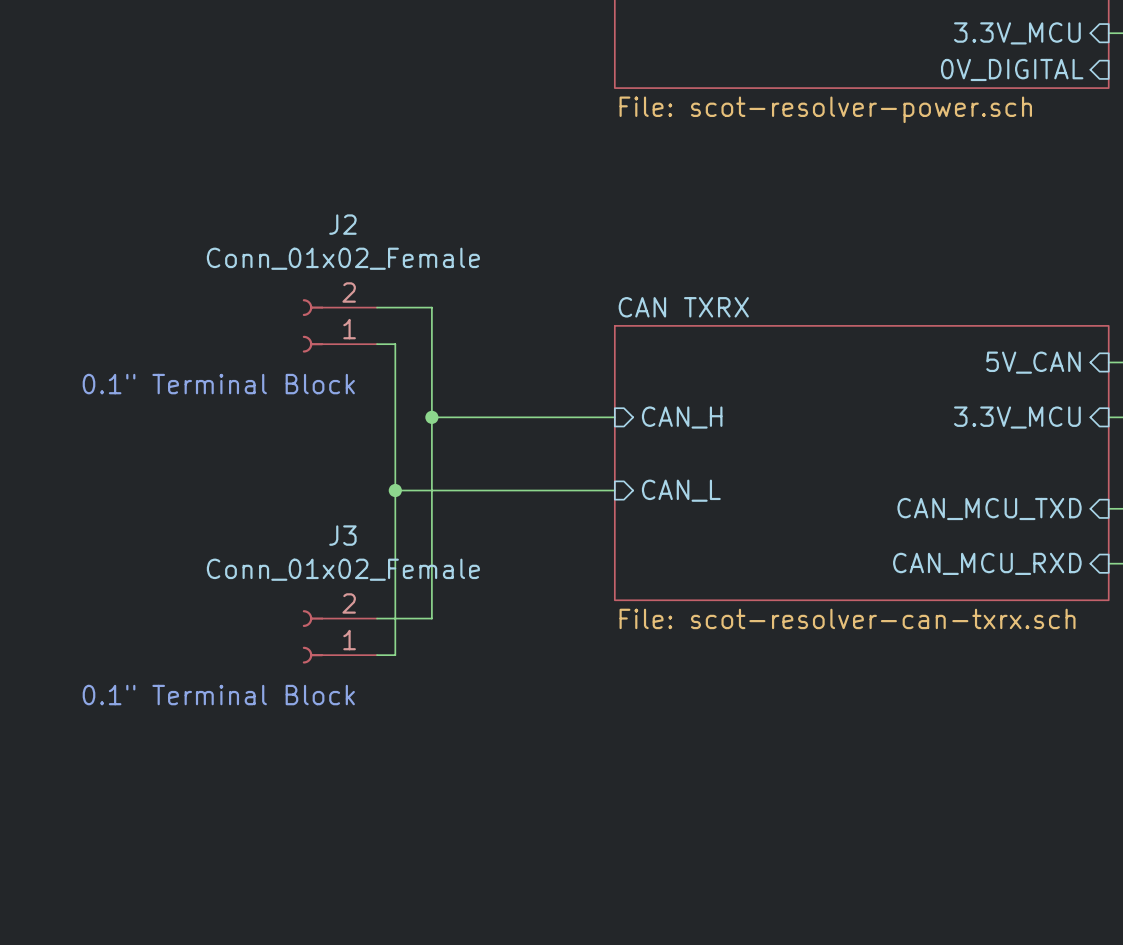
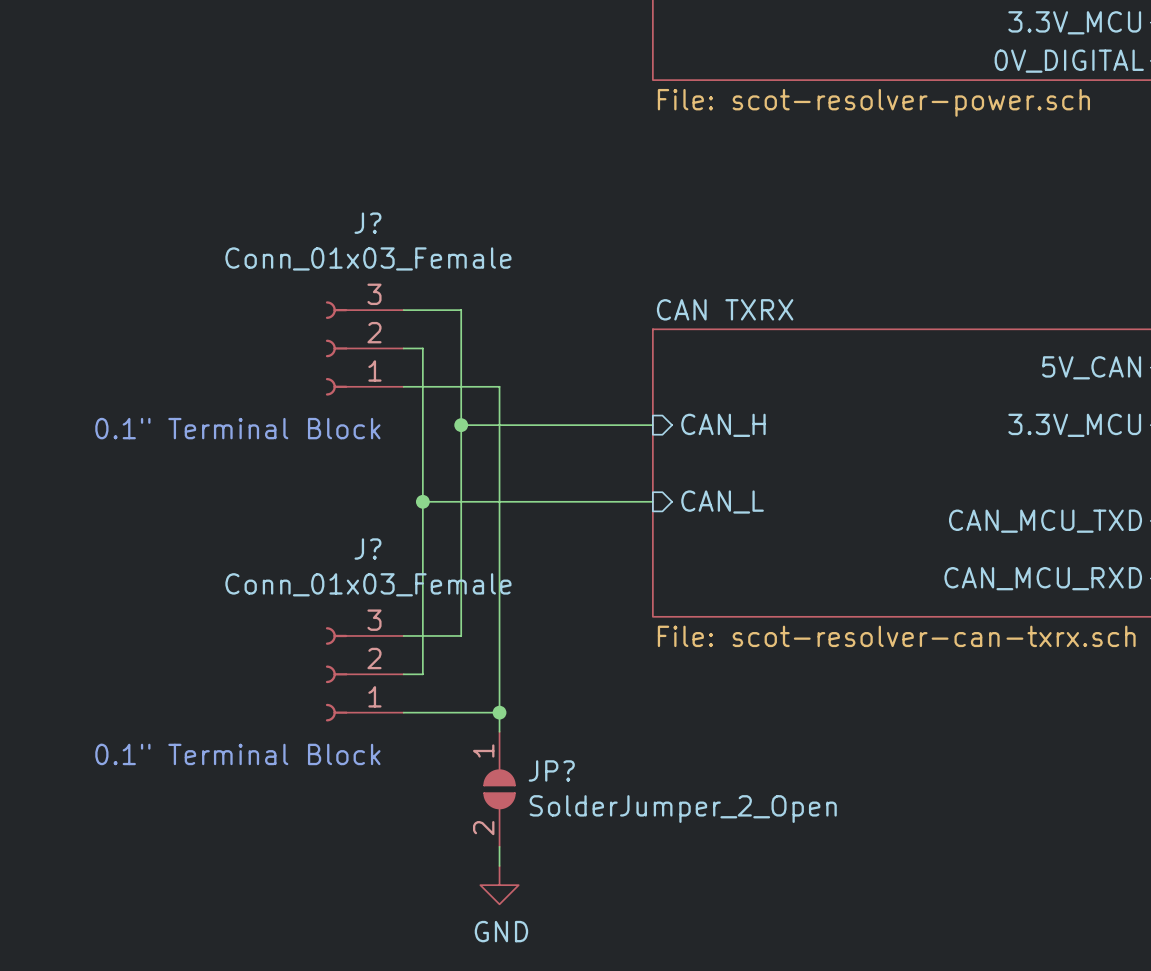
J2: Conn_01x02_Female (339, 325) -> none
J?: none -> Conn_01x03_Female (364, 348)
wire: none -> (403, 386) (499, 386) (499, 731)
text position: 0.1" Terminal Block (218, 384) -> 0.1" Terminal Block (237, 428)
J3: Conn_01x02_Female (339, 636) -> none
J?: none -> Conn_01x03_Female (364, 674)
wire: none -> (403, 712) (499, 712)
junction: none -> (499, 712)
text position: 0.1" Terminal Block (218, 695) -> 0.1" Terminal Block (237, 754)
JP?: none -> SolderJumper_2_Open (499, 789)
wire: none -> (499, 846) (499, 865)
power symbol: none -> GND (499, 885)

